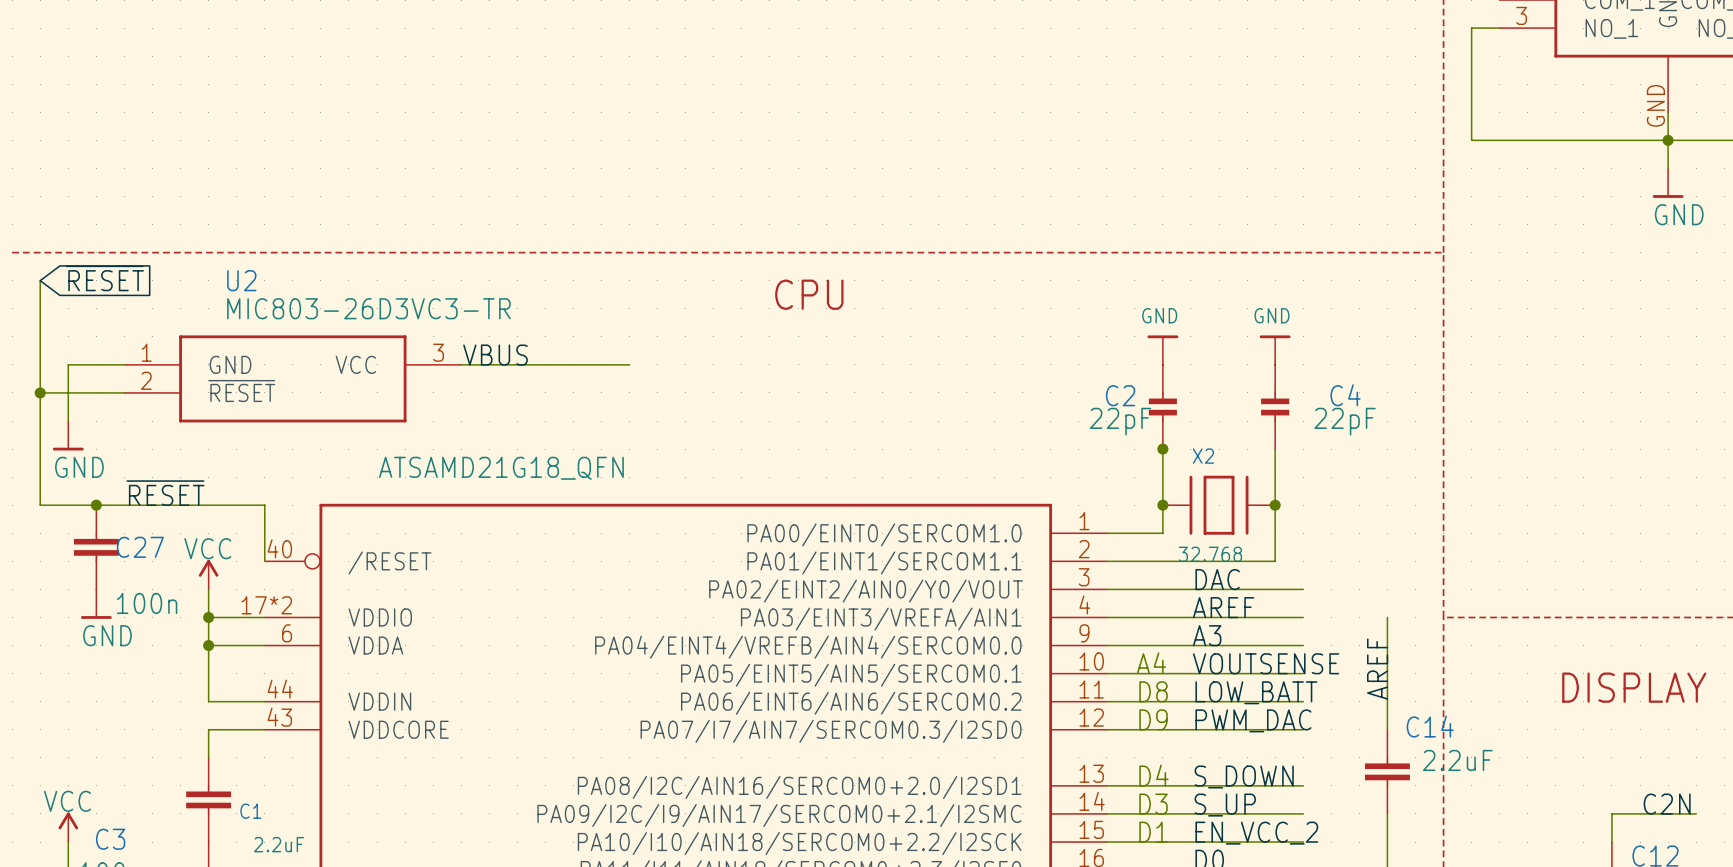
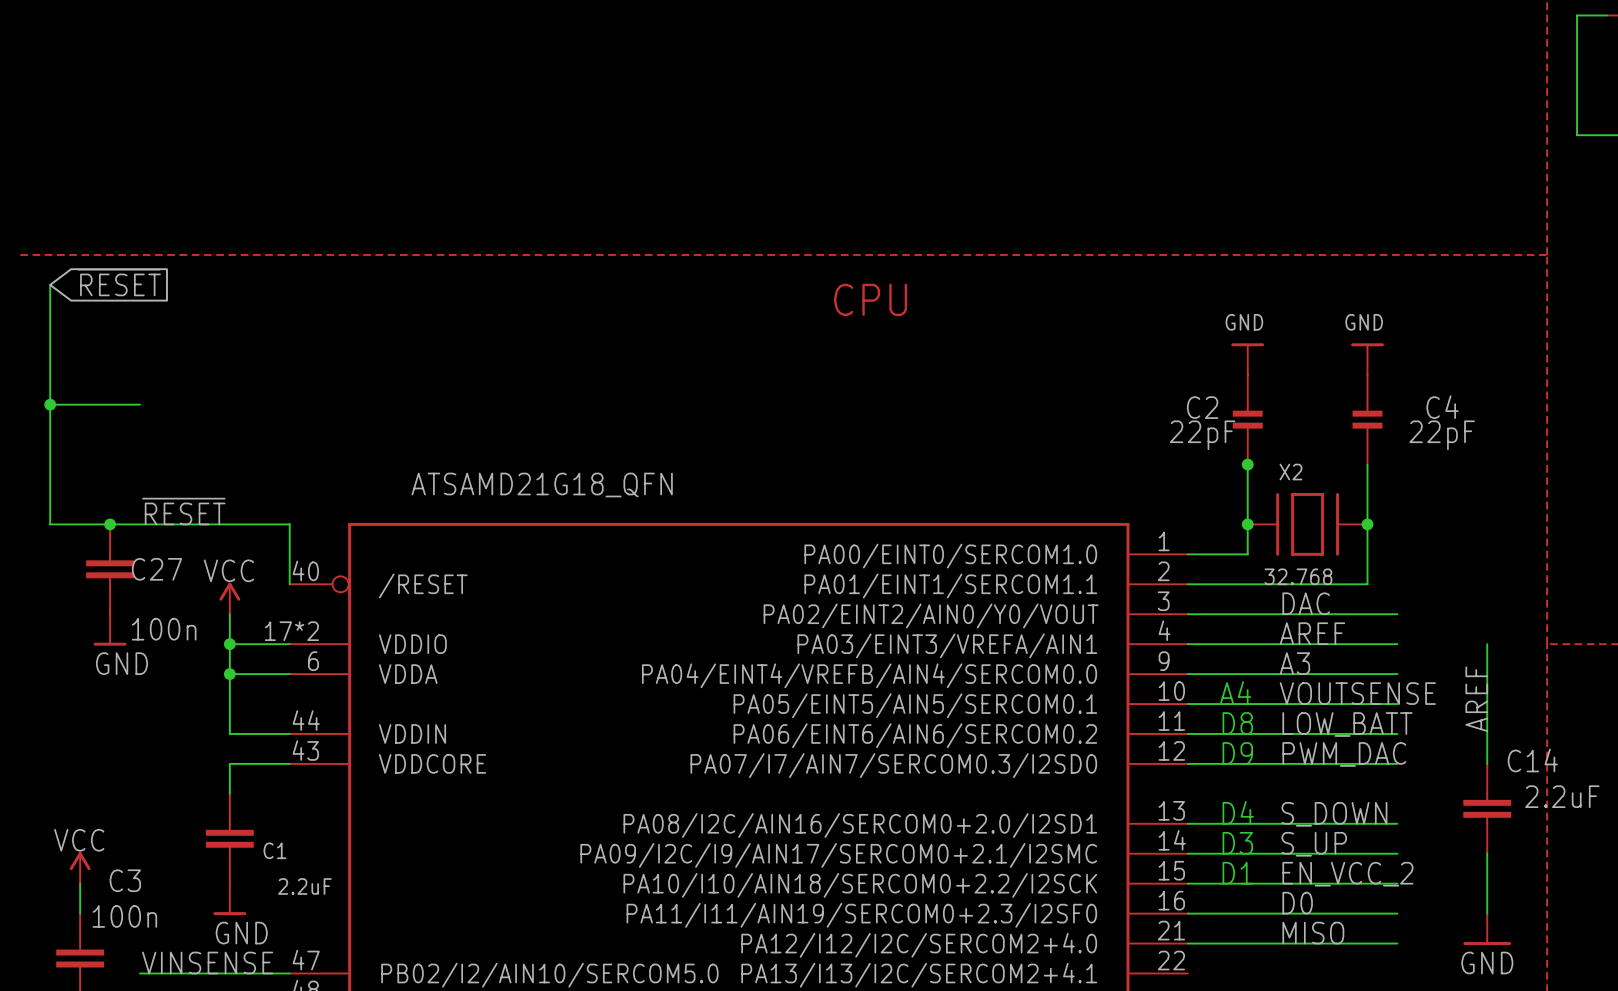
label: VBUS (495, 355) -> none
wire: (124, 364) (68, 364) (68, 421) -> none
wire: (461, 364) (629, 364) -> none
U2: MIC803-26D3VC3-TR (292, 378) -> none
power symbol: GND (68, 435) -> none

